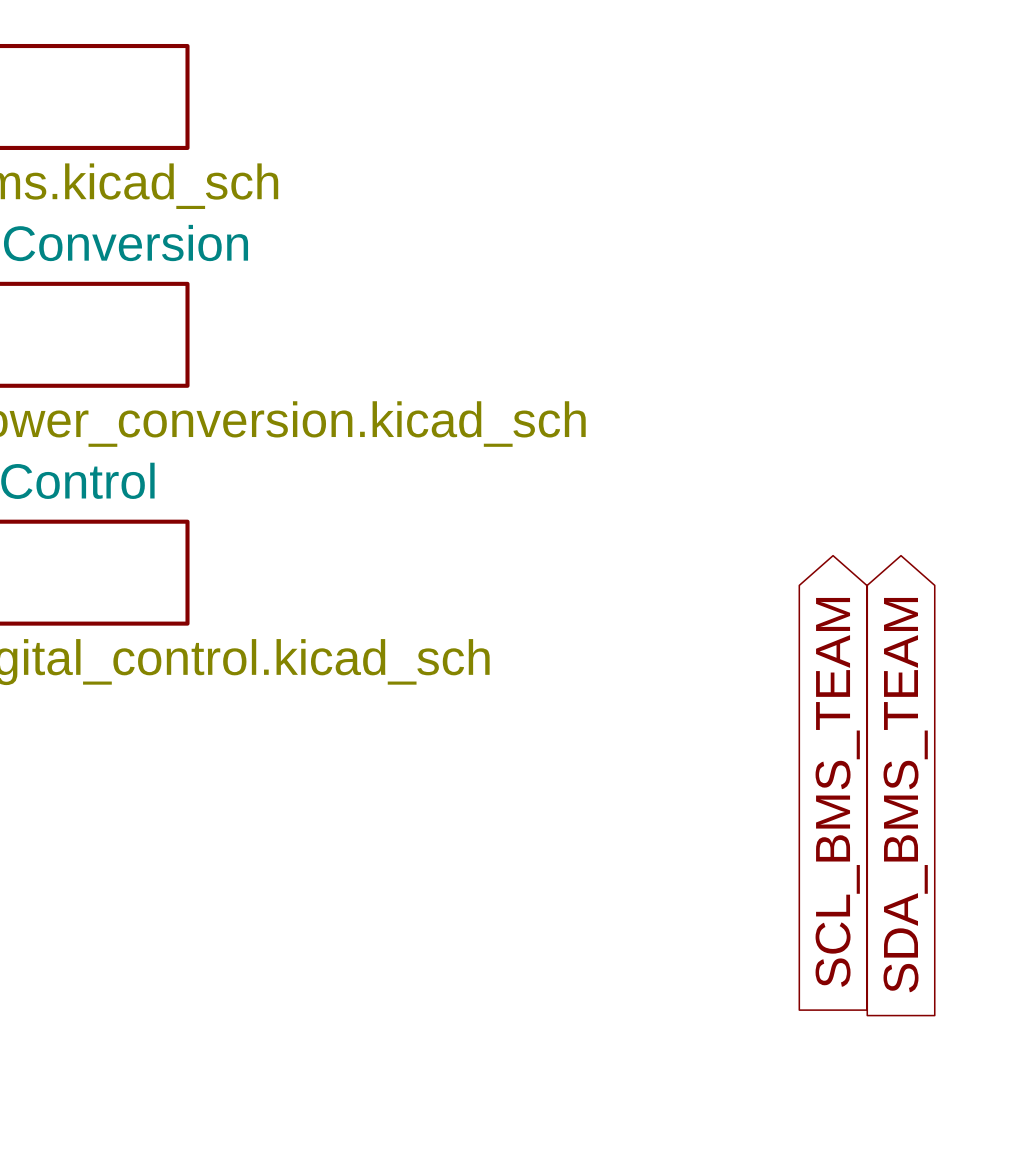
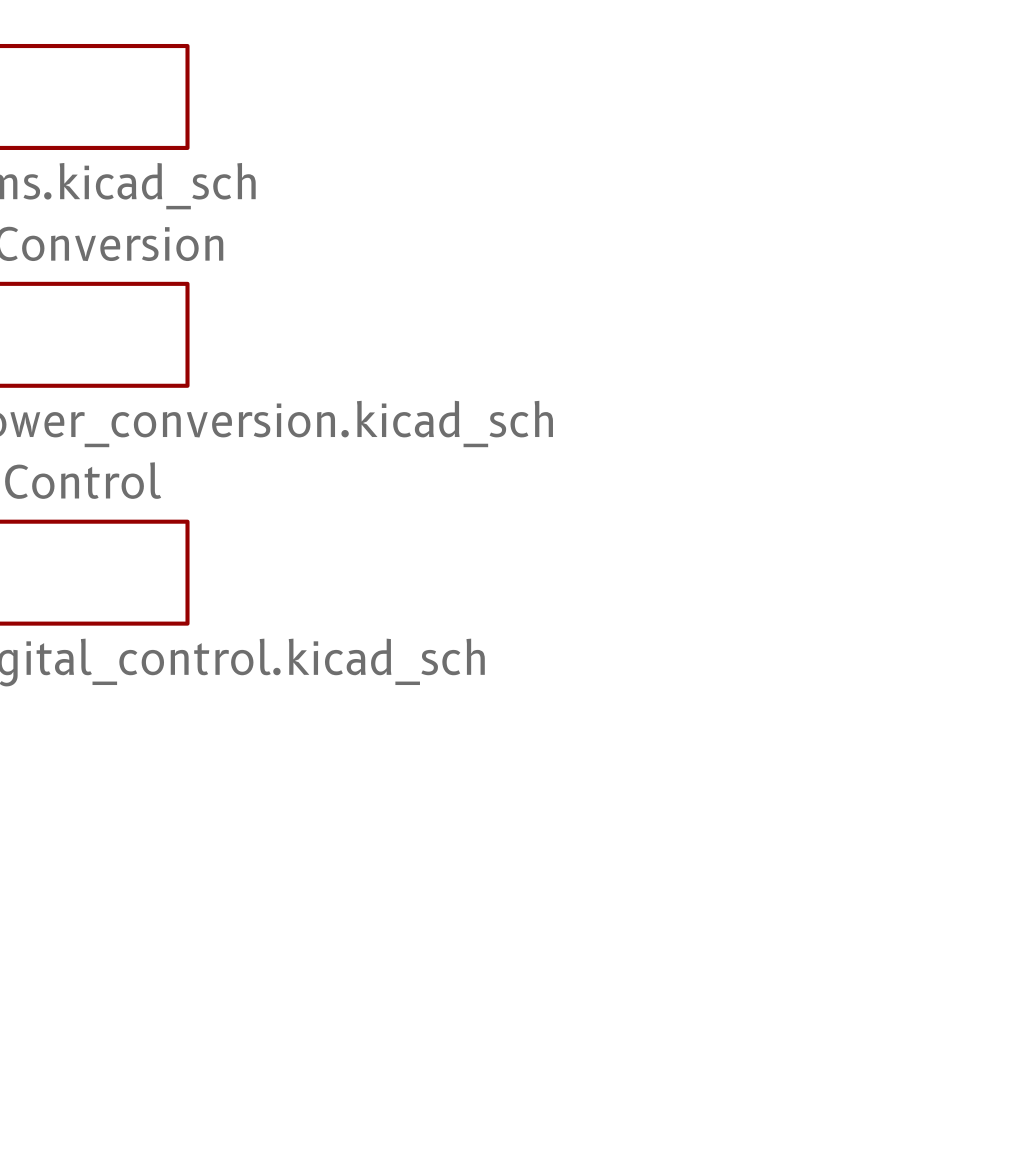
global label: SCL_BMS_TEAM (837, 792) -> none
global label: SDA_BMS_TEAM (905, 795) -> none

